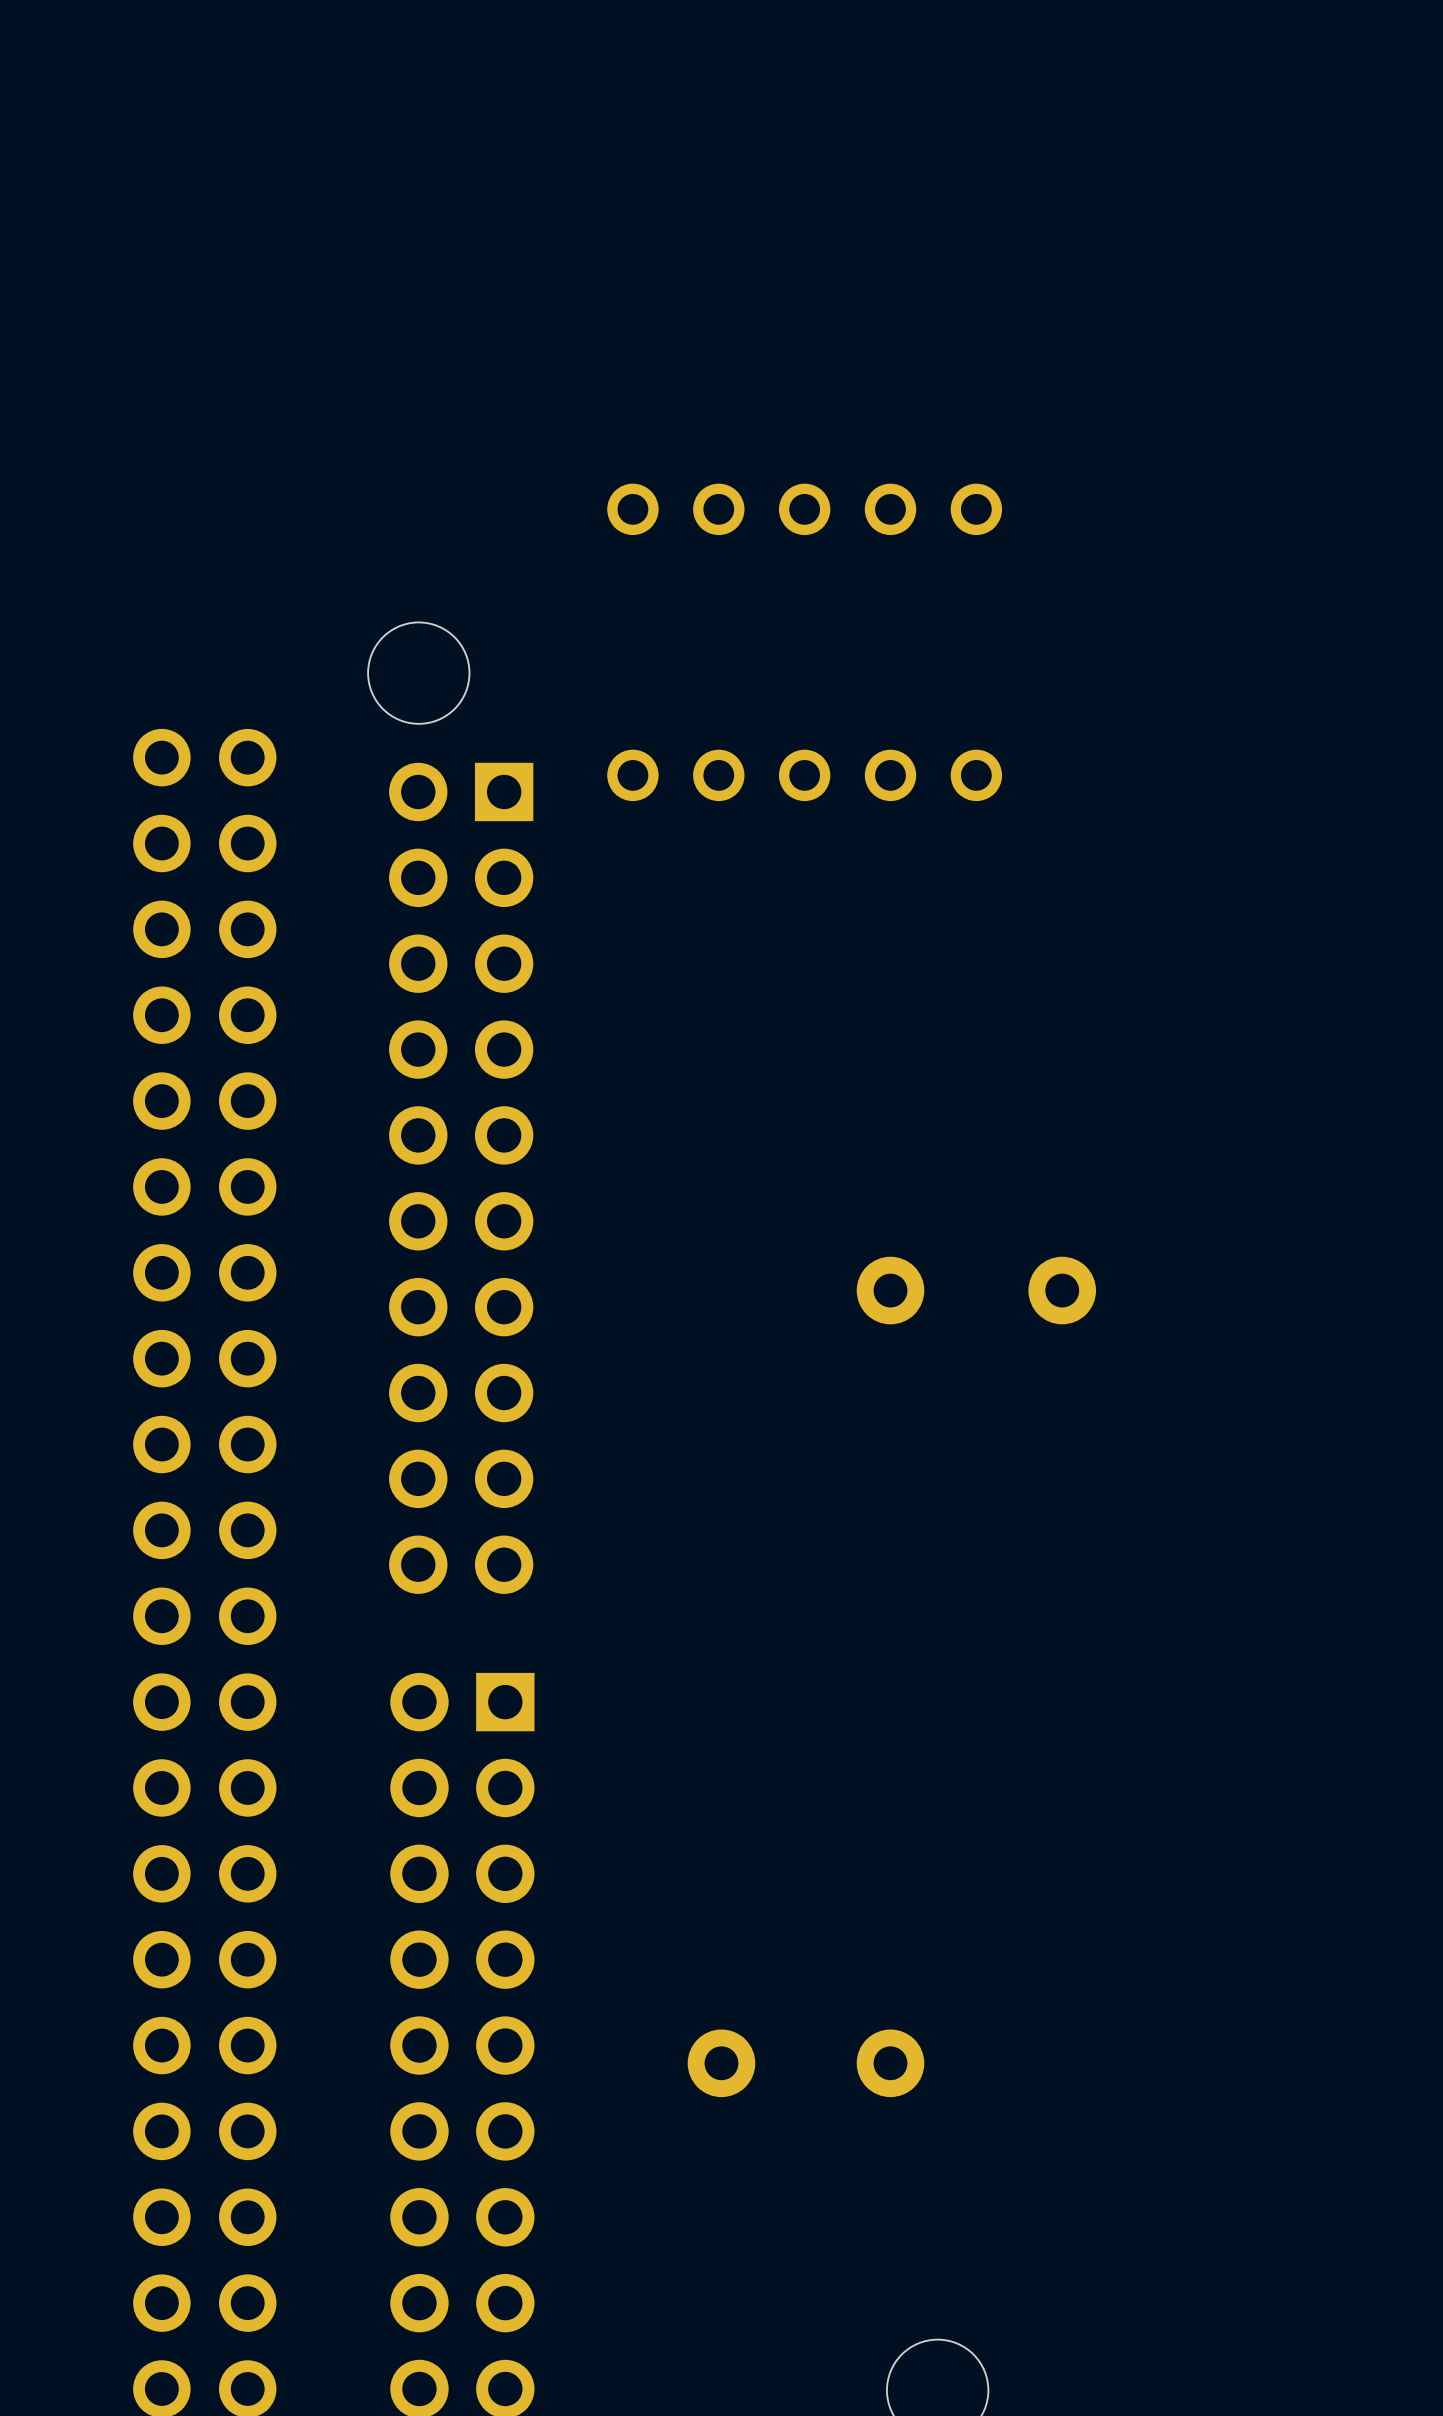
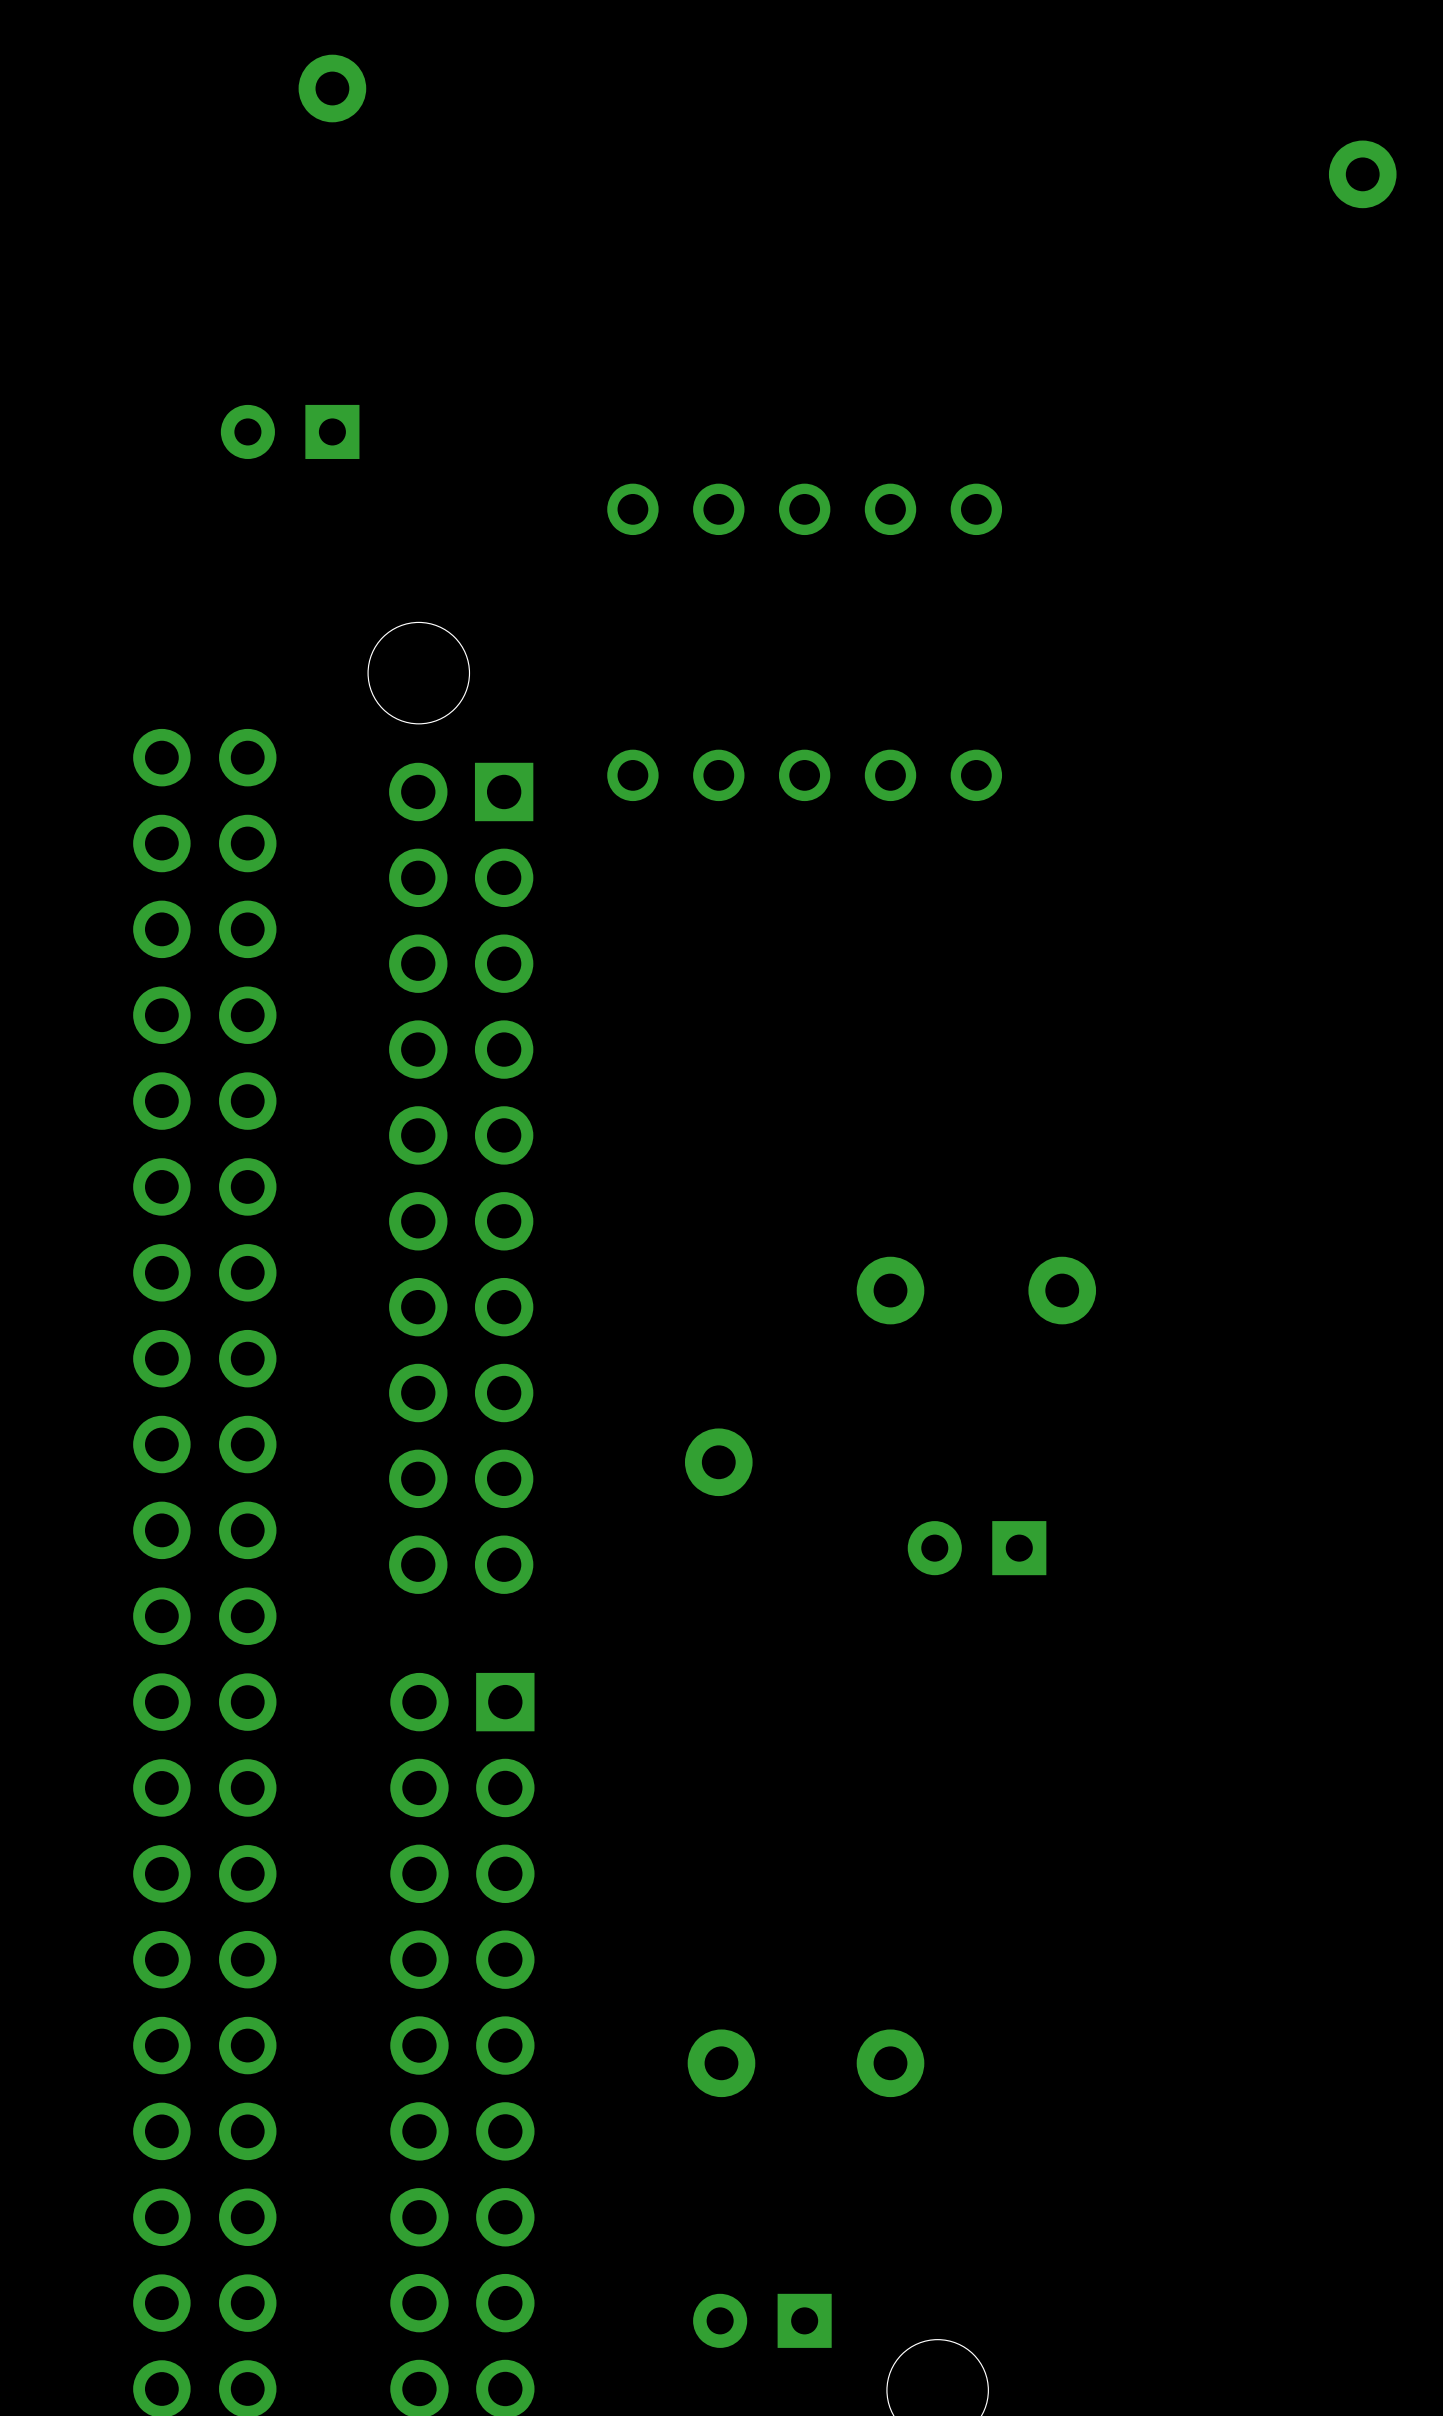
part: none -> (332, 88)
part: none -> (1362, 174)
part: none -> (290, 431)
part: none -> (718, 1462)
part: none -> (977, 1548)
part: none -> (762, 2320)

